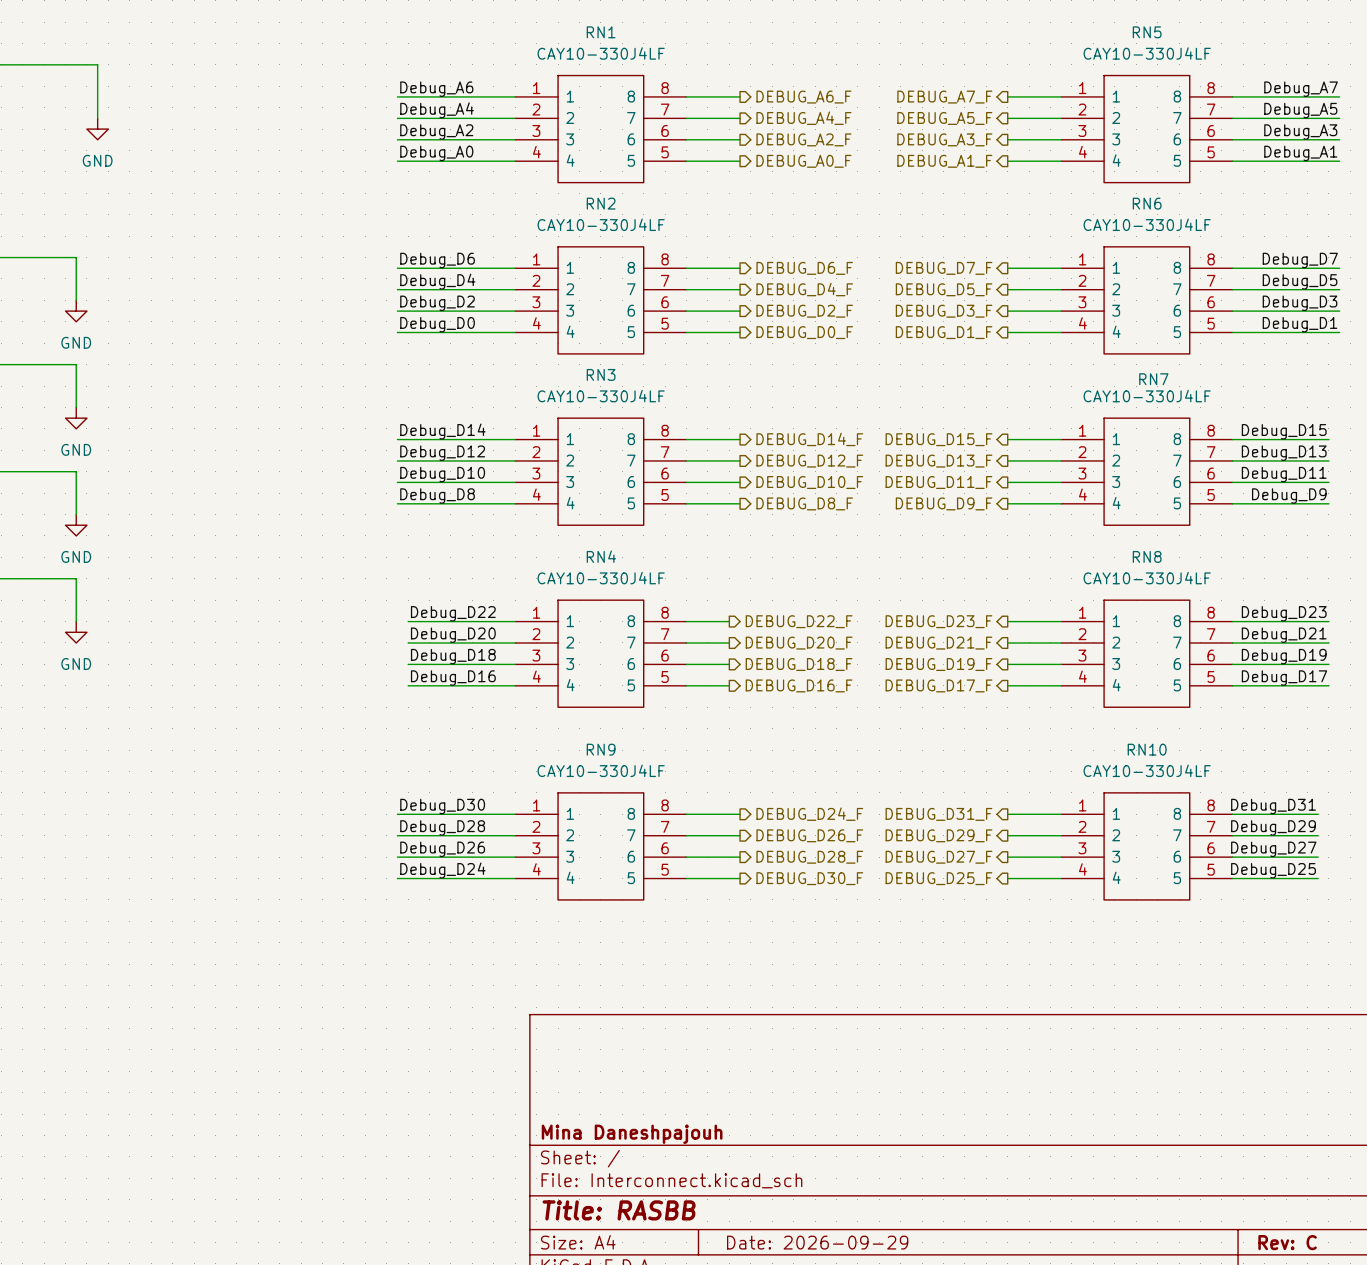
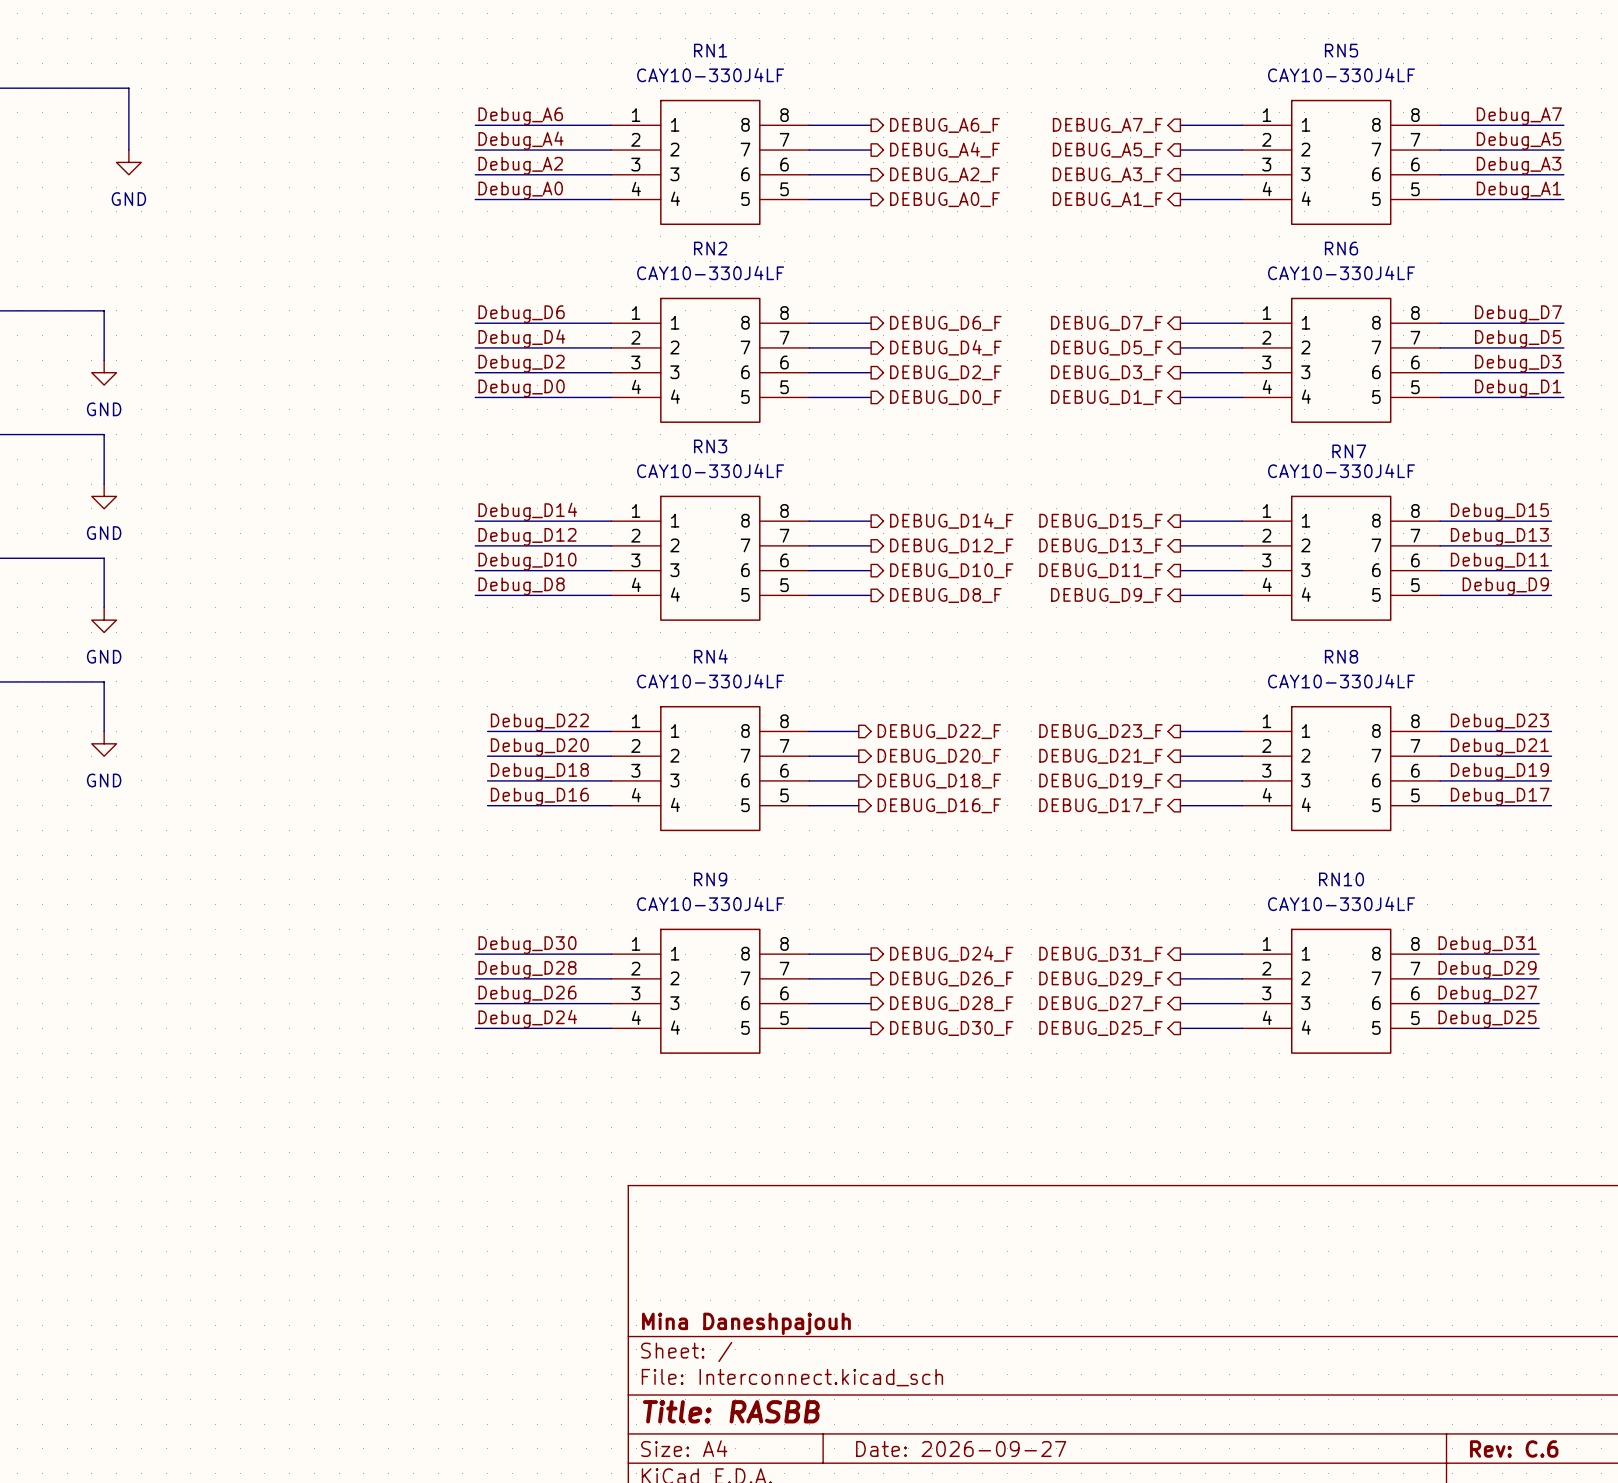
title block: Date: 2026-09-29 (817, 1242) -> Date: 2026-09-27 (961, 1449)
title block: Rev: C (1287, 1242) -> Rev: C.6 (1514, 1449)

